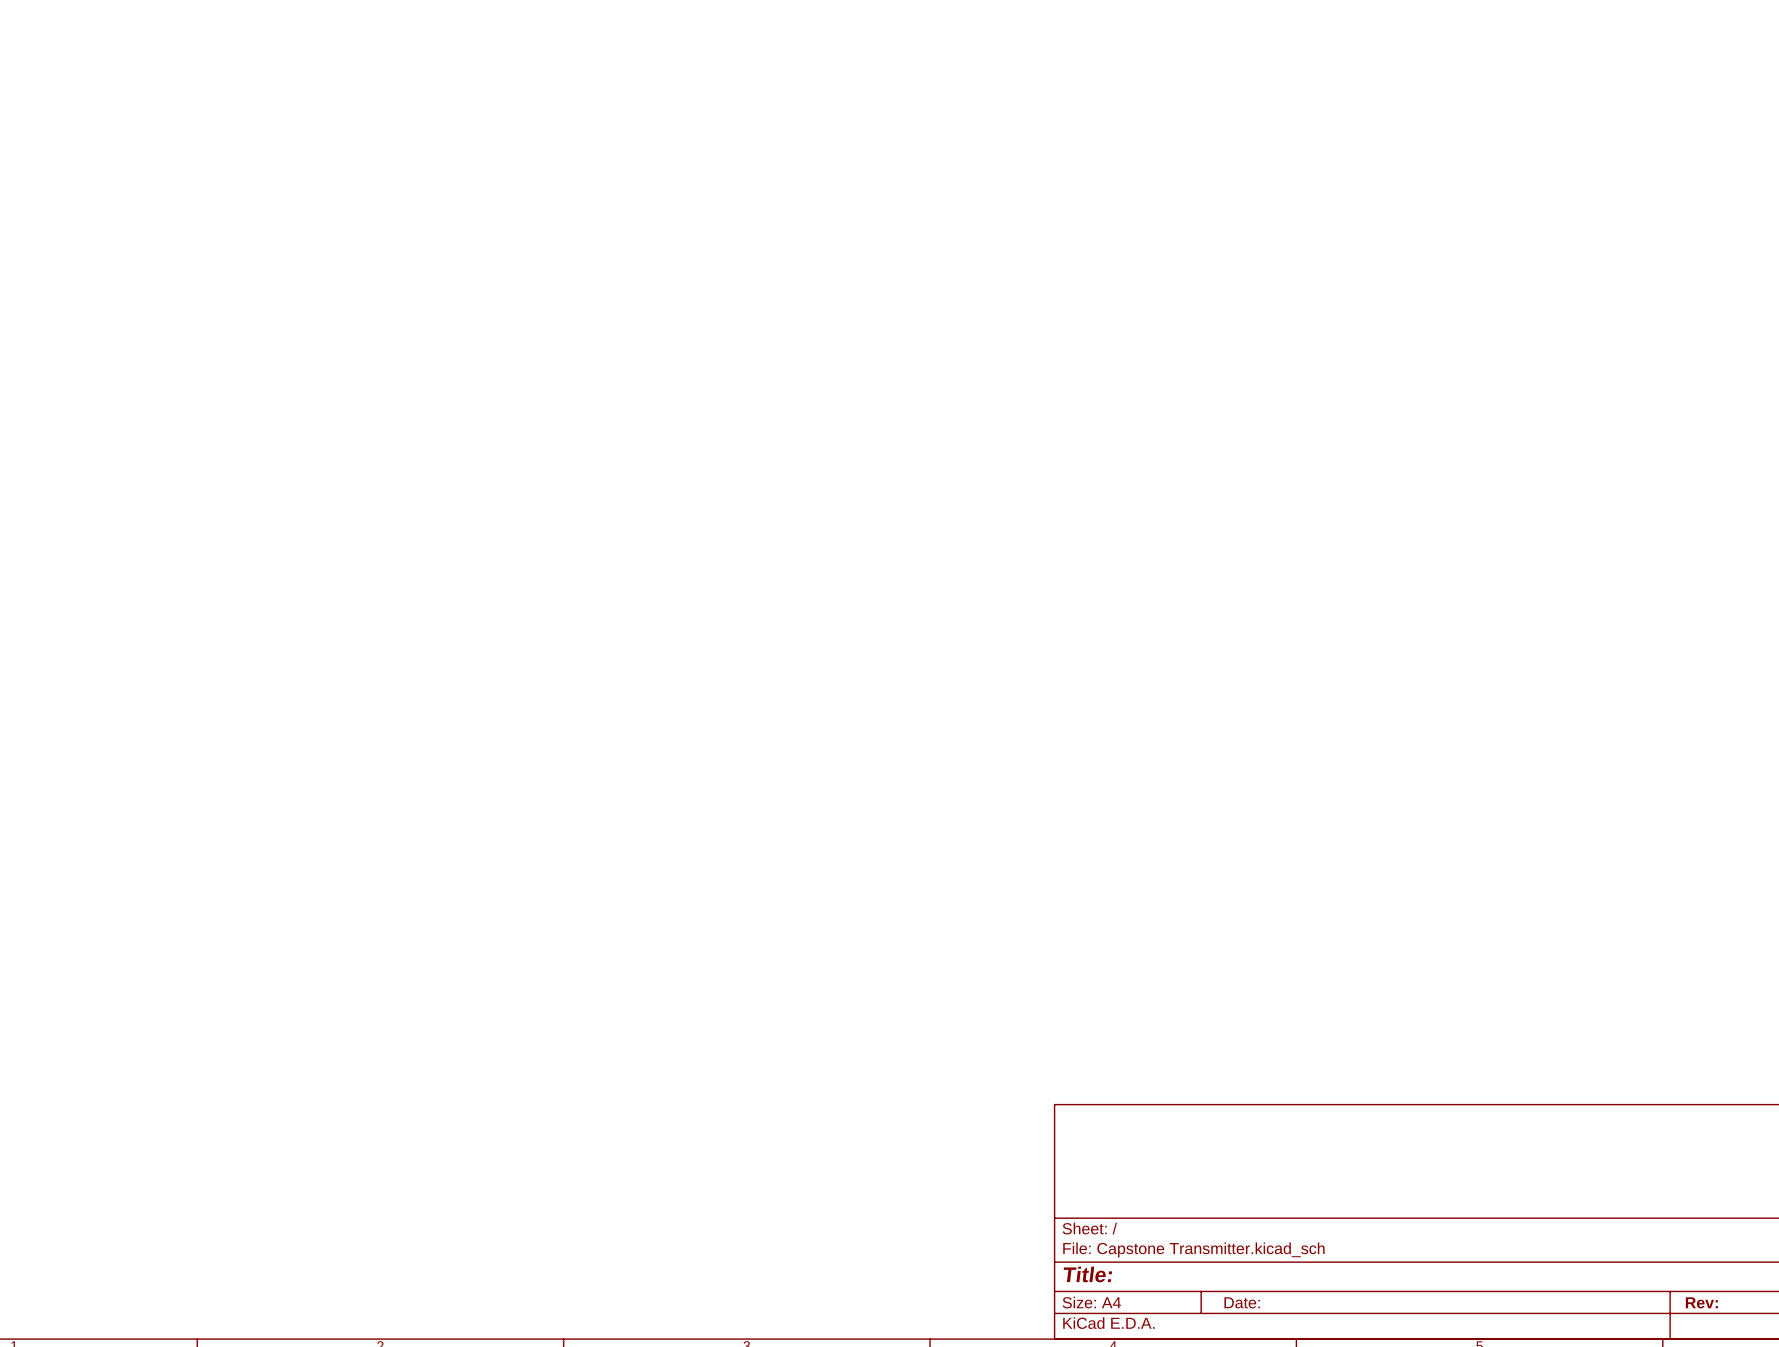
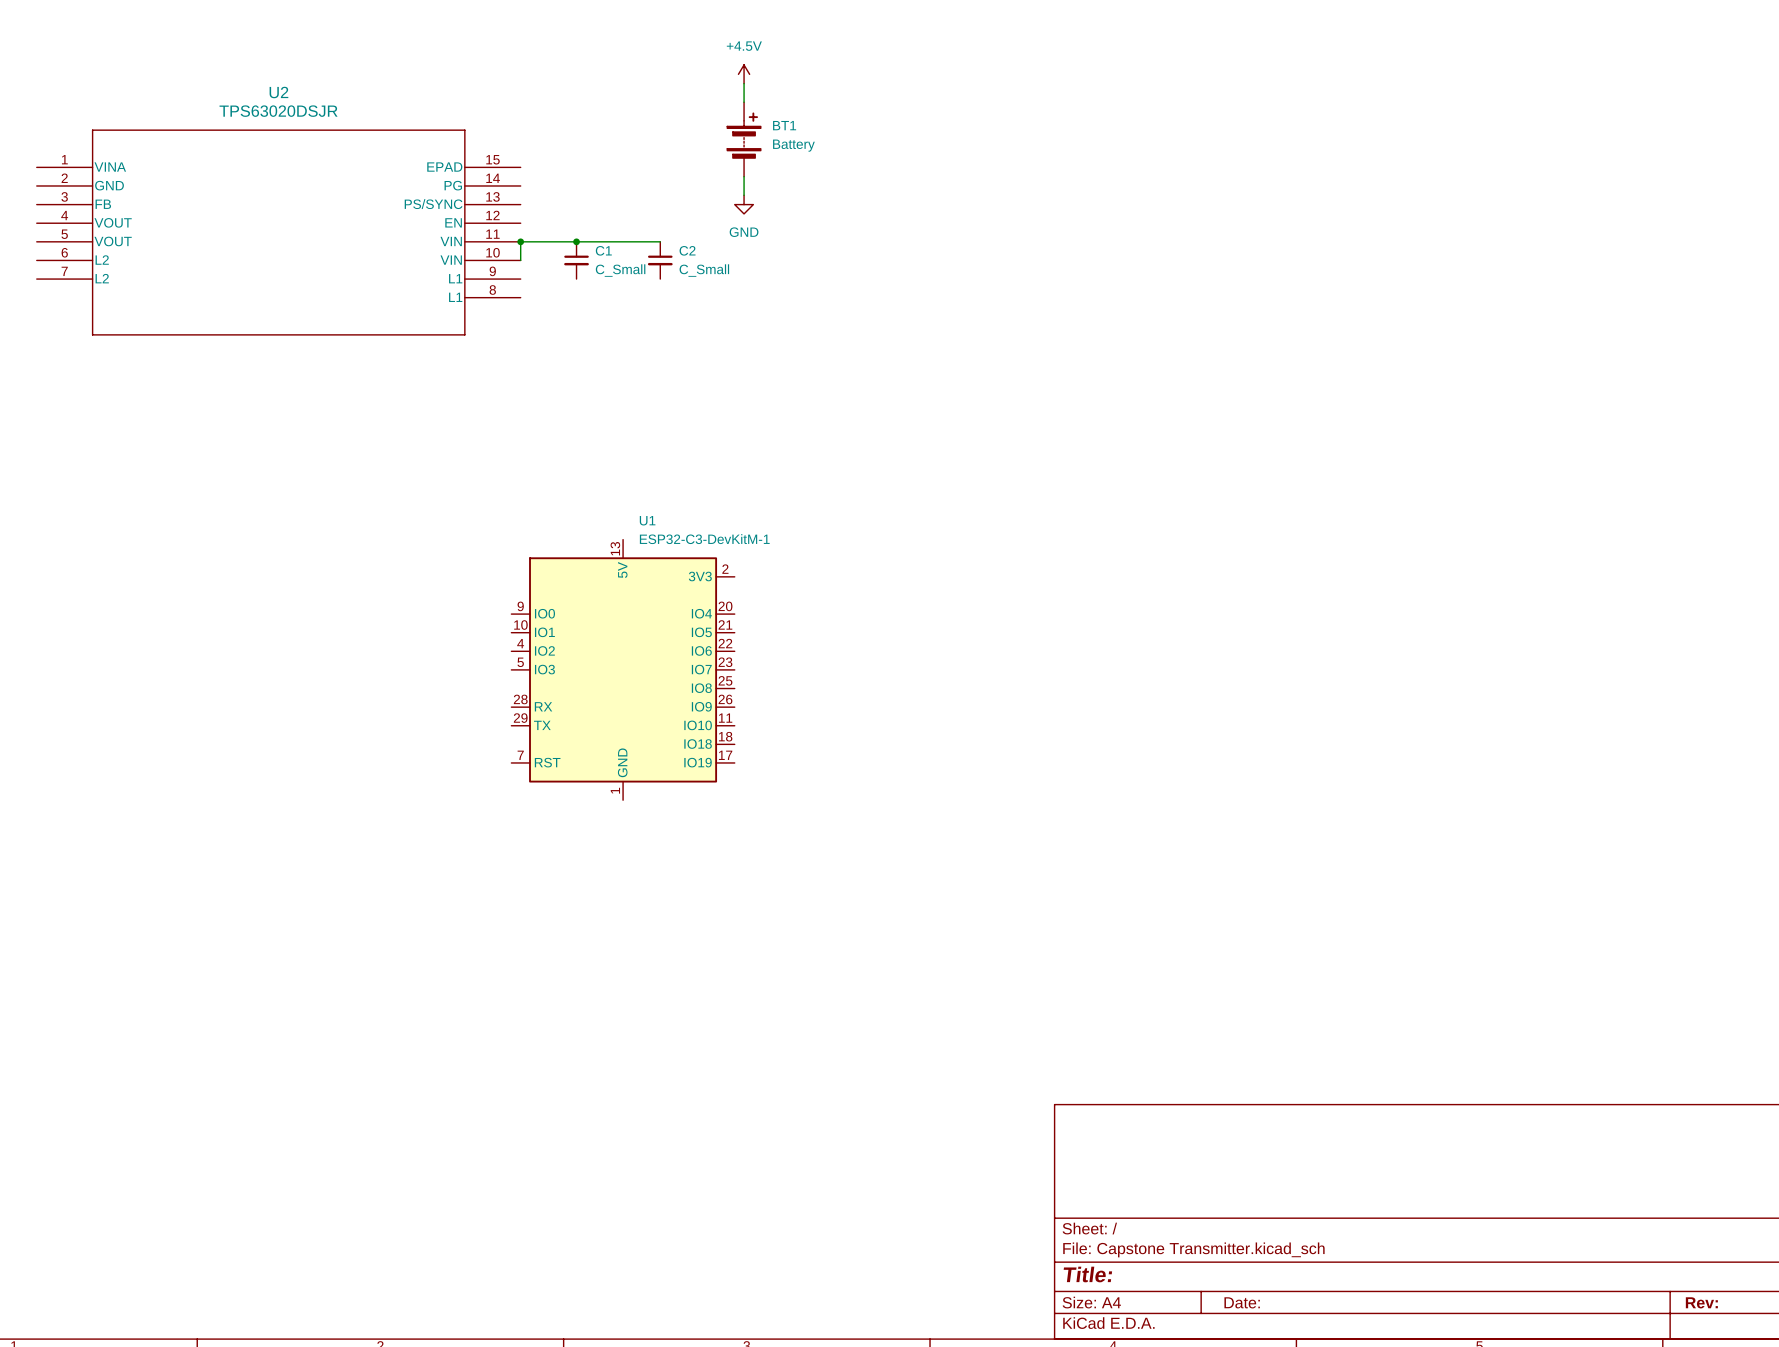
power symbol: none -> +4.5V (744, 74)
wire: none -> (744, 83) (744, 102)
BT1: none -> Battery (744, 139)
wire: none -> (744, 176) (744, 195)
power symbol: none -> GND (744, 204)
U2: none -> TPS63020DSJR (278, 232)
junction: none -> (520, 241)
junction: none -> (576, 241)
wire: none -> (660, 241) (520, 241) (520, 260)
C1: none -> C_Small (576, 260)
C2: none -> C_Small (660, 260)
U1: none -> ESP32-C3-DevKitM-1 (623, 669)

